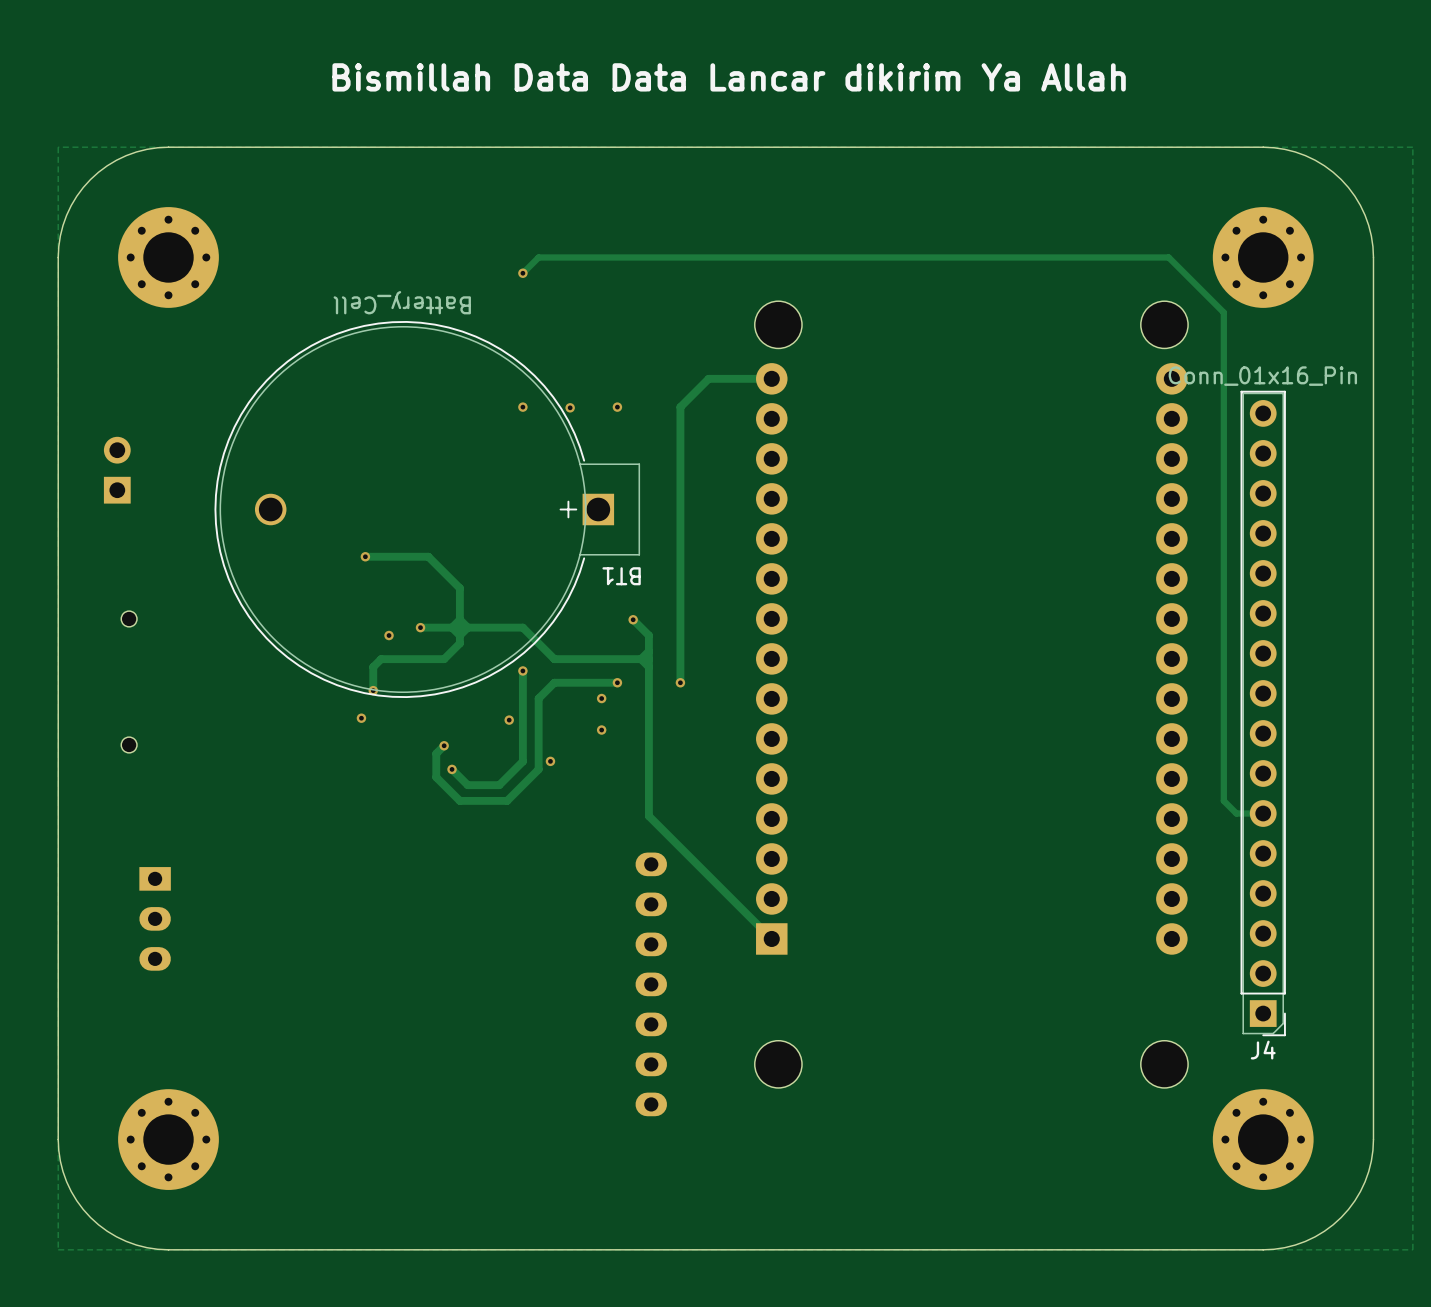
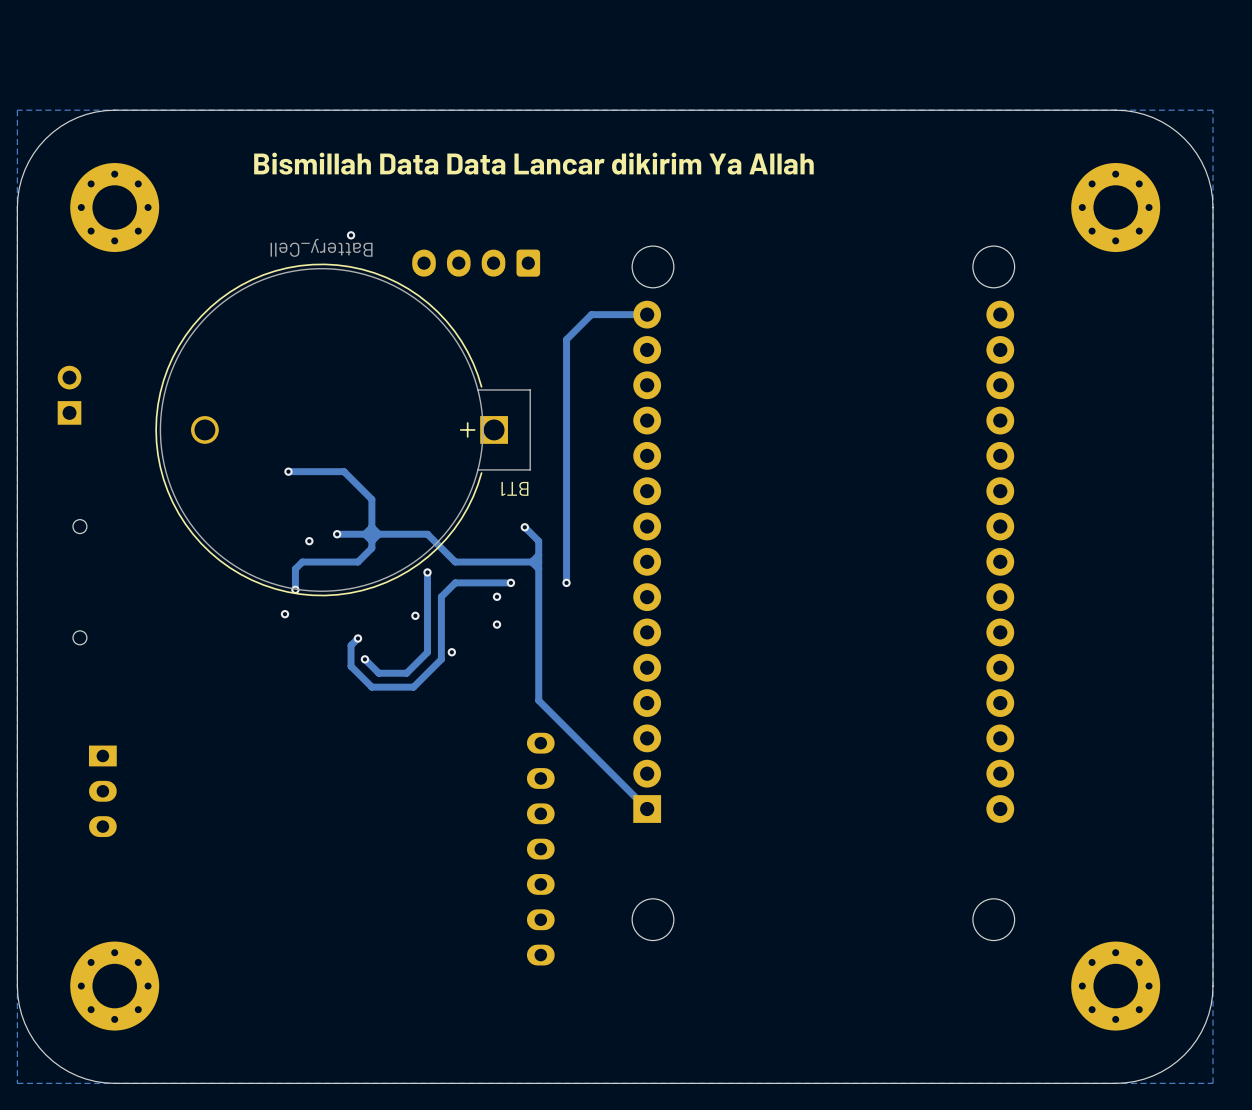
text position: Bismillah Data Data Lancar dikirim Ya Allah (729, 77) -> Bismillah Data Data Lancar dikirim Ya Allah (533, 163)
board edge: (1263, 147) (1284, 149) (1305, 155) (1324, 165) (1341, 179) (1354, 196) (1365, 215) (1371, 235) (1373, 257) (1372, 1150) (1368, 1171) (1360, 1191) (1341, 1217) (1324, 1231) (1305, 1241) (1284, 1247) (1263, 1249) -> (1080, 110) (1134, 112) (1152, 117) (1169, 126) (1190, 145) (1201, 161) (1208, 179) (1213, 207) (1213, 986) (1211, 1005) (1205, 1023) (1196, 1040) (1184, 1054) (1169, 1066) (1152, 1075) (1134, 1081) (1080, 1083)
part position: (1263, 257) -> (1115, 207)
track: (522, 273) (538, 257) (1168, 257) (1223, 312) (1223, 800) (1236, 813) (1263, 813) -> none
via: (522, 273) -> none
via: none -> (351, 235)
part: none -> (476, 263)
via: (522, 407) -> none
via: (570, 407) -> none
via: (617, 407) -> none
J4: Conn_01x16_Pin (1263, 713) -> none
part position: (1263, 1139) -> (1115, 986)

